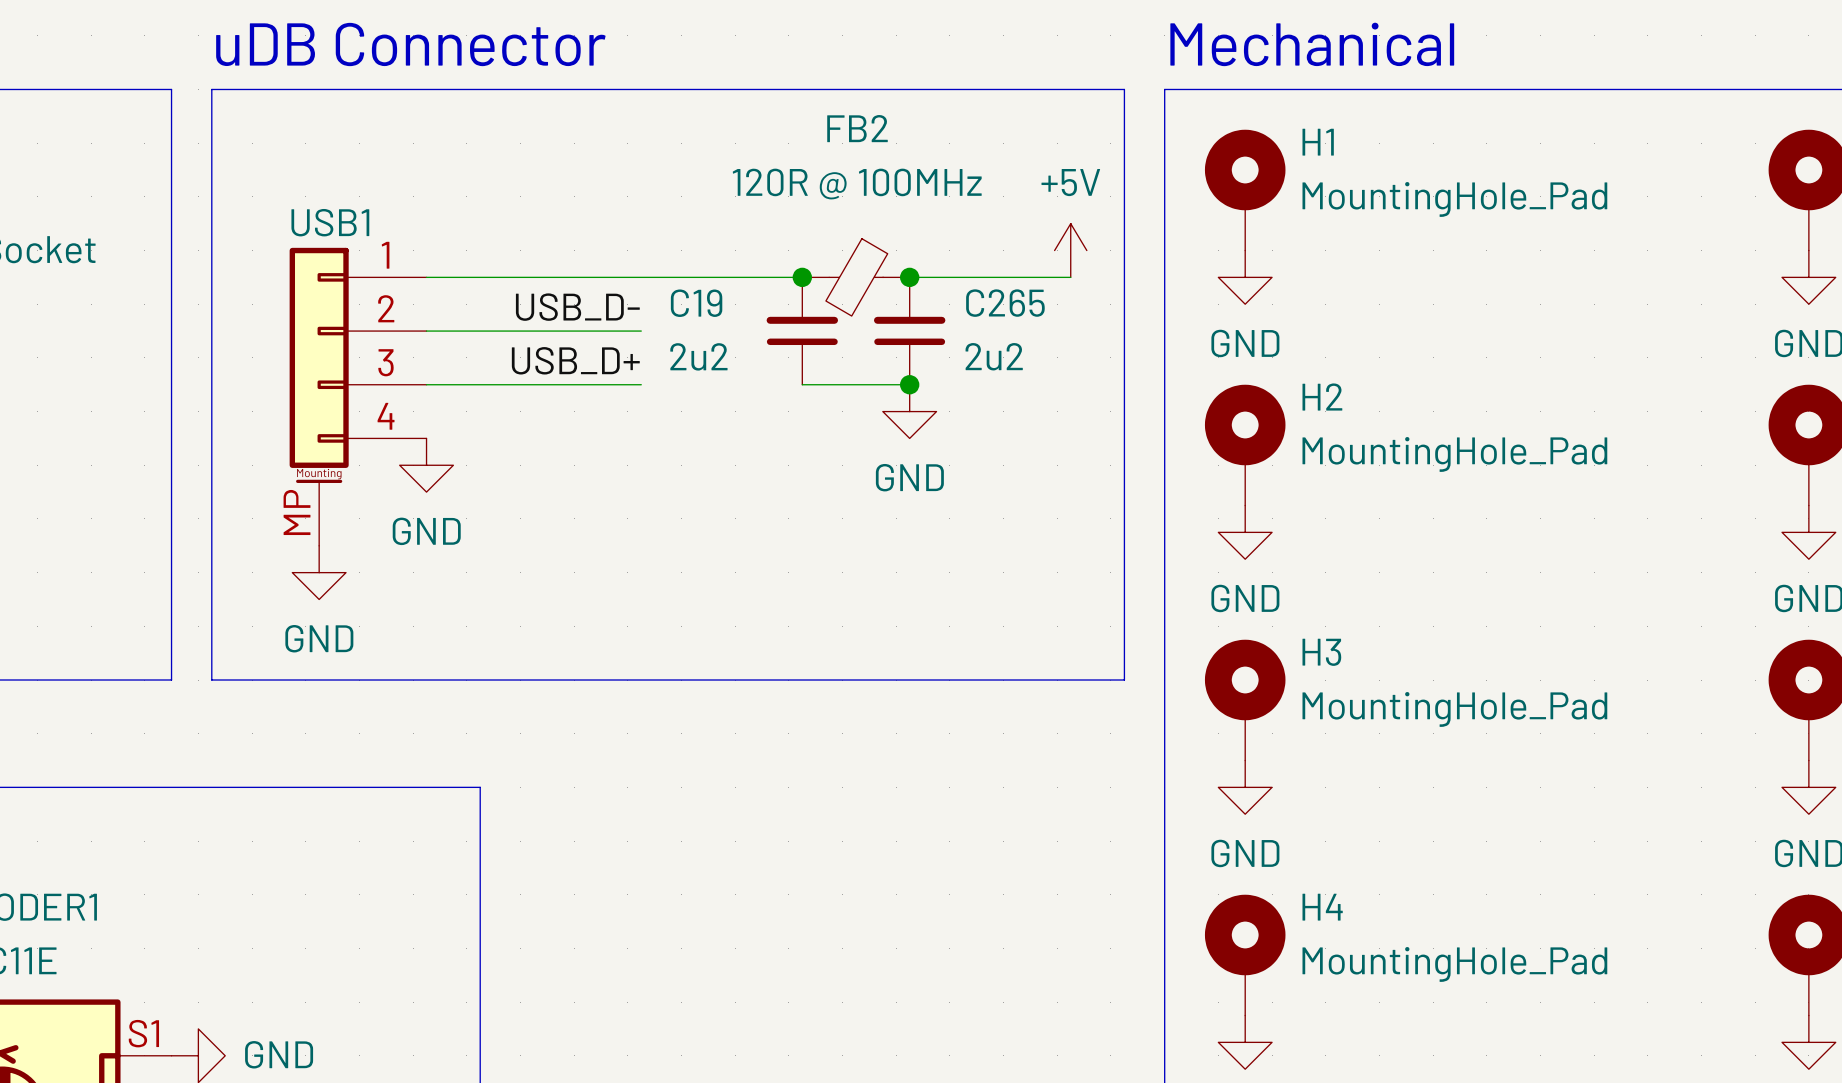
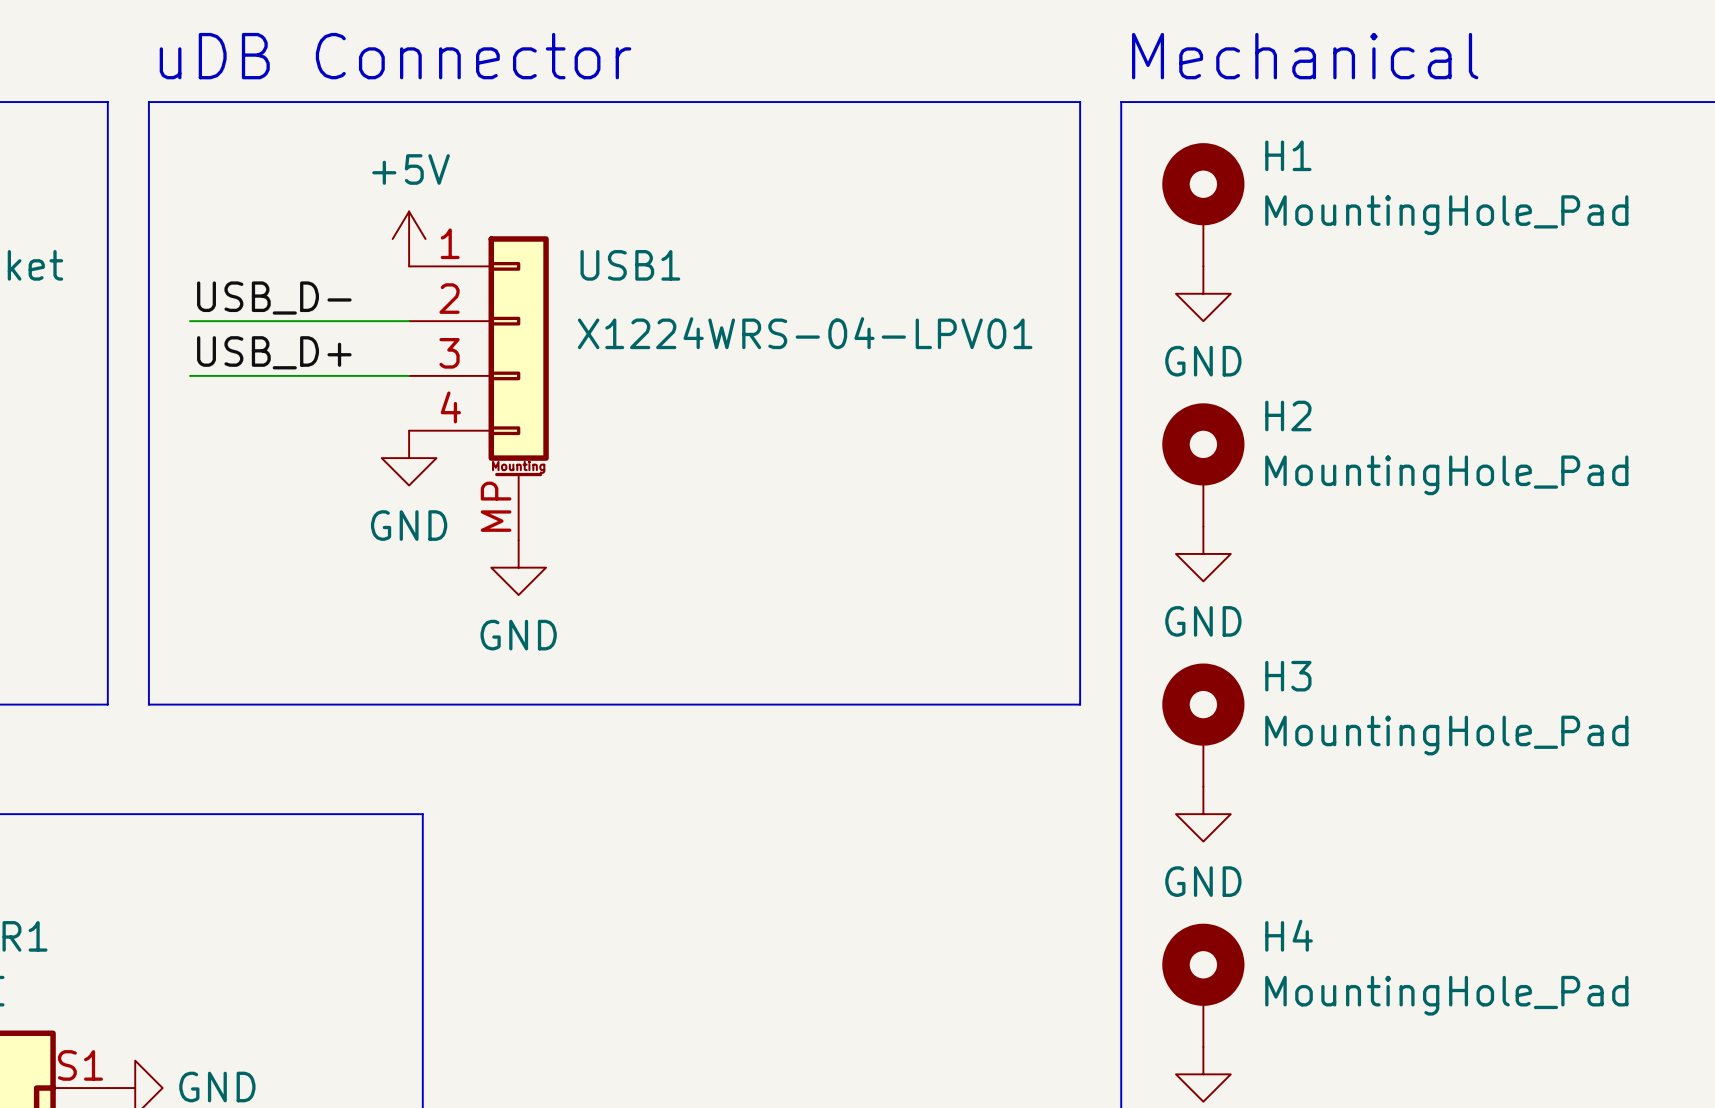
USB1 name position: USB1 (330, 222) -> USB1 (630, 265)
power symbol: none -> +5V (409, 238)
power symbol: +5V (1070, 250) -> none
wire: (426, 277) (802, 277) -> none
junction: (802, 277) -> none
FB2: 120R @ 100MHz (856, 277) -> none
wire: (909, 277) (1070, 277) -> none
junction: (909, 277) -> none
label position: USB_D- (577, 307) -> USB_D- (274, 298)
USB1 value: none -> X1224WRS-04-LPV01 (805, 333)
wire: (426, 331) (641, 331) -> (189, 321) (409, 321)
C19: 2u2 (802, 331) -> none
C265: 2u2 (909, 331) -> none
label position: USB_D+ (575, 360) -> USB_D+ (274, 352)
USB1 flip: as is (319, 365) -> left-right (518, 356)
wire: (426, 384) (641, 384) -> (189, 375) (409, 375)
wire: (802, 384) (909, 384) -> none
junction: (909, 384) -> none
USB1 position: (358, 396) -> (478, 388)
power symbol: GND (909, 411) -> none
power symbol position: GND (426, 465) -> GND (409, 458)
power symbol: none -> GND (518, 567)
power symbol: GND (319, 572) -> none

